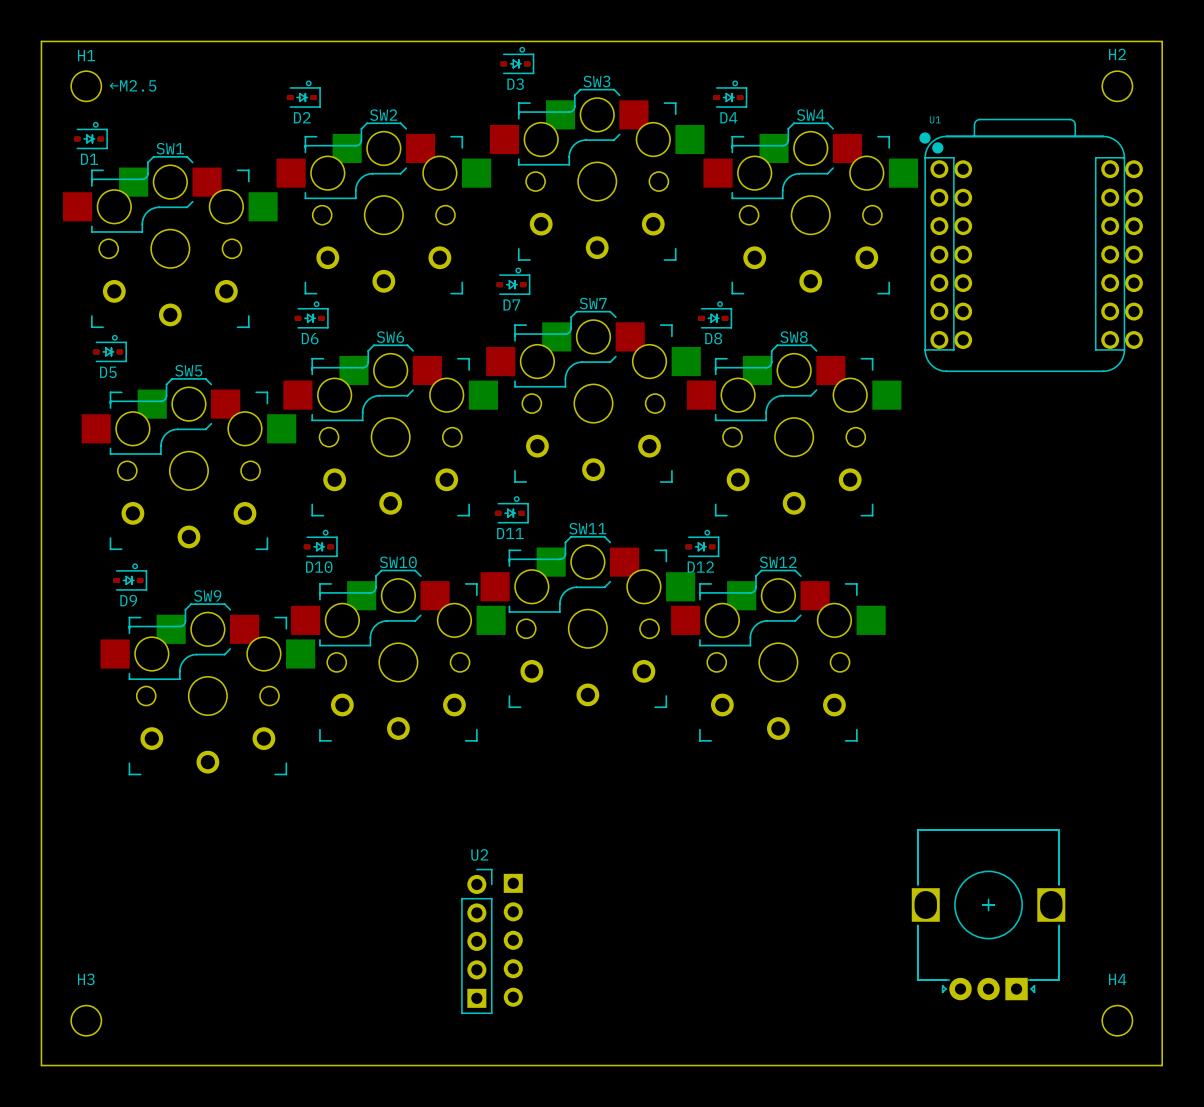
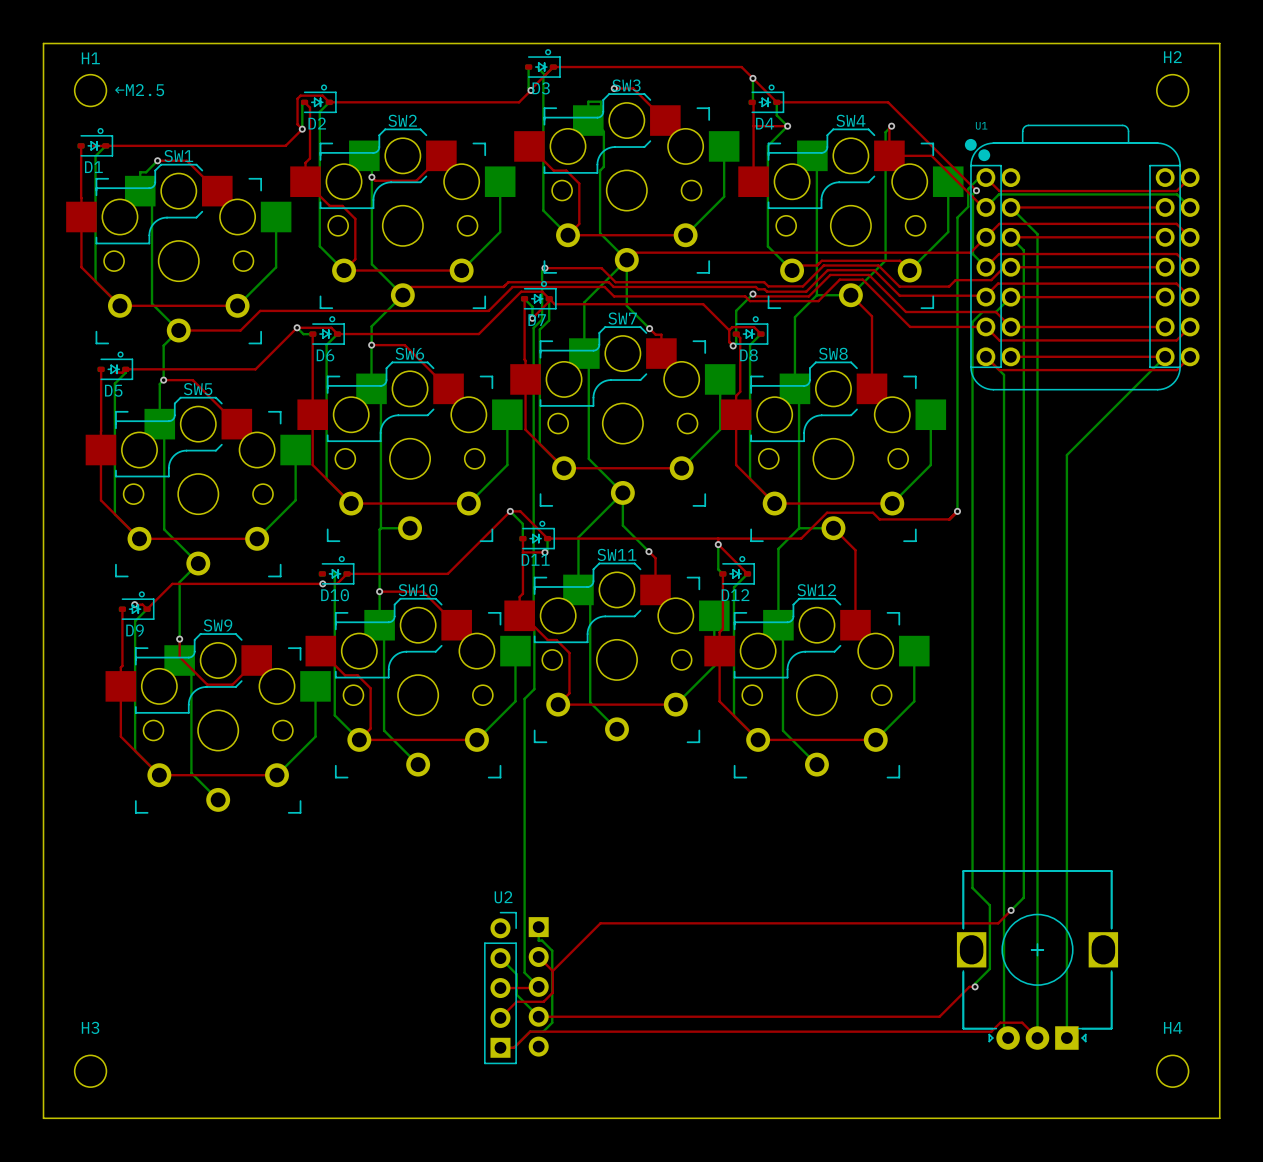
bottom track: none -> (528, 67) (528, 88) (530, 90)
bottom track: none -> (553, 67) (543, 77) (543, 210) (568, 235)
bottom track: none -> (538, 68) (545, 75)
bottom track: none -> (752, 78) (752, 102)
via: none -> (752, 78)
top track: none -> (614, 88) (633, 88) (665, 120)
via: none -> (614, 88)
via: none -> (530, 90)
top track: none -> (304, 102) (310, 107) (310, 158) (305, 162) (305, 181) (329, 205) (342, 205) (355, 218) (355, 259) (344, 270) (461, 270)
bottom track: none -> (304, 102) (302, 104) (302, 129)
bottom track: none -> (329, 102) (319, 111) (319, 246) (344, 270)
top track: none -> (752, 102) (753, 181)
bottom track: none -> (776, 102) (776, 115) (787, 126) (767, 145) (767, 246) (792, 270)
bottom track: none -> (588, 120) (588, 101) (601, 101) (603, 166) (600, 170) (600, 233) (626, 259)
top track: none -> (753, 126) (787, 126)
via: none -> (787, 126)
top track: none -> (891, 126) (889, 128) (889, 155) (931, 155) (983, 207) (985, 207)
bottom track: none -> (891, 126) (885, 132) (885, 260) (850, 295) (816, 295)
via: none -> (891, 126)
via: none -> (302, 129)
top track: none -> (81, 145) (81, 267) (119, 305) (237, 305)
top track: none -> (93, 145) (285, 145) (302, 129) (297, 124) (297, 98) (300, 95) (322, 95) (329, 102) (519, 102) (553, 67) (741, 67) (776, 102) (888, 102) (976, 190)
bottom track: none -> (105, 145) (95, 156) (95, 281) (119, 305)
top track: none -> (529, 146) (553, 170) (566, 170) (579, 183) (579, 223) (568, 235) (685, 235)
bottom track: none -> (724, 146) (724, 196) (685, 235)
bottom track: none -> (364, 155) (371, 163) (371, 264) (402, 295) (371, 326) (371, 345)
top track: none -> (441, 155) (416, 180) (375, 180) (371, 177)
bottom track: none -> (812, 155) (816, 160) (816, 295)
top track: none -> (157, 160) (186, 160) (217, 191)
bottom track: none -> (157, 160) (146, 172) (140, 172) (140, 191) (152, 202) (152, 303) (178, 330) (163, 345) (163, 380) (159, 384) (159, 424) (164, 428) (164, 529) (198, 563) (179, 582) (179, 660) (191, 672) (191, 773) (218, 799)
via: none -> (157, 160)
via: none -> (371, 177)
top track: none -> (985, 177) (999, 191) (1176, 191) (1190, 177)
bottom track: none -> (985, 177) (979, 177) (968, 188) (968, 206) (957, 217) (957, 511) (949, 519)
bottom track: none -> (500, 181) (500, 232) (461, 270)
bottom track: none -> (948, 181) (948, 232) (909, 270)
bottom track: none -> (976, 190) (972, 194) (972, 254) (985, 267)
via: none -> (976, 190)
bottom track: none -> (985, 207) (998, 194) (1177, 194) (1190, 207)
top track: none -> (1010, 207) (1165, 207)
bottom track: none -> (1010, 207) (1037, 234) (1037, 1038)
bottom track: none -> (276, 217) (276, 267) (237, 305)
top track: none -> (1010, 237) (1165, 237)
bottom track: none -> (1010, 237) (1023, 250) (1023, 897) (1011, 910)
top track: none -> (1190, 237) (1176, 223) (999, 223) (970, 252) (634, 252) (626, 259)
bottom track: none -> (626, 259) (626, 305) (649, 328)
bottom track: none -> (626, 259) (584, 302) (584, 353) (588, 358) (588, 458) (622, 492)
top track: none -> (985, 267) (999, 254) (1176, 254) (1190, 267)
top track: none -> (1165, 267) (1004, 267) (991, 280) (955, 280) (949, 286) (899, 286) (878, 265) (823, 265) (802, 286) (768, 286) (764, 282) (615, 282) (601, 268) (544, 268)
bottom track: none -> (544, 268) (542, 271) (542, 319) (533, 327) (534, 689) (524, 698) (524, 972) (538, 986)
via: none -> (544, 268)
top track: none -> (792, 270) (797, 265) (817, 265) (821, 260) (899, 260) (909, 270)
top track: none -> (752, 294) (755, 296) (808, 296) (830, 274) (868, 274) (905, 311) (995, 311) (1010, 326) (1165, 326)
bottom track: none -> (752, 294) (736, 310) (736, 342) (733, 345) (729, 341)
via: none -> (752, 294)
top track: none -> (402, 295) (411, 286) (503, 286) (508, 282) (608, 282) (613, 286) (755, 286) (767, 291) (806, 291) (827, 270) (874, 270) (899, 295) (985, 295)
bottom track: none -> (816, 295) (794, 317) (794, 388) (799, 392) (799, 528)
top track: none -> (850, 295) (871, 316) (871, 388)
top track: none -> (985, 295) (998, 283) (1176, 283) (1190, 297)
top track: none -> (1010, 297) (1165, 297)
bottom track: none -> (1010, 297) (995, 311) (982, 311) (972, 321) (972, 888) (989, 905) (989, 968) (975, 983) (975, 986)
top track: none -> (524, 298) (525, 429) (564, 468) (681, 468)
bottom track: none -> (524, 298) (532, 306) (532, 318)
bottom track: none -> (549, 298) (549, 320) (539, 329) (539, 444) (564, 468)
top track: none -> (550, 300) (554, 304) (703, 304) (729, 330)
top track: none -> (550, 300) (542, 291) (521, 291) (478, 334) (337, 334) (331, 327) (297, 327) (255, 369) (125, 369) (122, 372) (115, 372)
top track: none -> (550, 300) (532, 318)
via: none -> (532, 318)
top track: none -> (1190, 326) (1176, 340) (999, 340) (985, 326) (910, 326) (862, 279) (839, 279) (818, 301) (750, 301) (745, 296) (614, 296) (604, 286) (512, 286) (488, 310) (260, 310) (240, 330) (178, 330)
bottom track: none -> (297, 327) (303, 334) (312, 334)
via: none -> (297, 327)
top track: none -> (649, 328) (655, 334) (661, 334) (661, 353)
via: none -> (649, 328)
top track: none -> (729, 330) (732, 327) (754, 327) (761, 334)
top track: none -> (729, 330) (729, 341) (733, 345)
top track: none -> (312, 334) (312, 465) (351, 503) (468, 503)
bottom track: none -> (337, 334) (326, 345) (326, 478) (351, 503)
top track: none -> (736, 334) (740, 337) (740, 391) (736, 395) (736, 465) (774, 503) (892, 503)
bottom track: none -> (760, 334) (750, 345) (750, 478) (774, 503)
bottom track: none -> (371, 345) (371, 388) (380, 398) (380, 528)
top track: none -> (371, 345) (404, 345) (448, 388)
via: none -> (371, 345)
via: none -> (733, 345)
top track: none -> (985, 356) (999, 370) (1176, 370) (1190, 356)
bottom track: none -> (985, 356) (1004, 374) (1004, 1033) (1008, 1038)
top track: none -> (1010, 356) (1165, 356)
bottom track: none -> (1165, 356) (1066, 455) (1066, 1038)
top track: none -> (101, 369) (100, 500) (139, 538) (257, 538)
bottom track: none -> (125, 369) (125, 372) (114, 383) (114, 514) (139, 538)
bottom track: none -> (720, 379) (720, 429) (681, 468)
top track: none -> (163, 380) (192, 380) (236, 424)
via: none -> (163, 380)
bottom track: none -> (507, 414) (507, 465) (468, 503)
bottom track: none -> (930, 414) (930, 465) (892, 503)
bottom track: none -> (295, 450) (295, 500) (257, 538)
bottom track: none -> (622, 492) (622, 525) (648, 551)
bottom track: none -> (622, 492) (578, 537) (578, 589) (590, 601) (590, 702) (616, 729)
bottom track: none -> (510, 511) (522, 523) (522, 538)
via: none -> (510, 511)
top track: none -> (957, 511) (949, 519) (879, 519) (872, 512) (827, 512) (801, 538) (547, 538) (520, 511) (510, 511) (447, 573) (347, 573) (337, 583) (172, 583) (147, 609) (142, 604) (134, 604)
via: none -> (957, 511)
bottom track: none -> (380, 528) (379, 625) (384, 629) (384, 730) (418, 764)
bottom track: none -> (380, 528) (410, 528)
bottom track: none -> (799, 528) (833, 528)
bottom track: none -> (799, 528) (778, 548) (778, 625) (782, 629) (782, 730) (816, 764)
top track: none -> (833, 528) (855, 550) (855, 625)
top track: none -> (522, 538) (522, 593) (519, 596) (519, 615)
bottom track: none -> (547, 538) (547, 549) (544, 552)
top track: none -> (718, 538) (718, 544) (747, 573)
bottom track: none -> (718, 544) (718, 569) (722, 573)
via: none -> (718, 544)
top track: none -> (648, 551) (655, 558) (655, 589)
via: none -> (648, 551)
top track: none -> (522, 552) (544, 552)
via: none -> (544, 552)
bottom track: none -> (334, 572) (334, 715) (359, 739)
top track: none -> (722, 573) (722, 628) (719, 632) (719, 701) (758, 739) (875, 739)
bottom track: none -> (747, 573) (734, 587) (734, 715) (758, 739)
via: none -> (322, 583)
top track: none -> (379, 591) (423, 591) (456, 625)
via: none -> (379, 591)
via: none -> (134, 604)
top track: none -> (122, 609) (120, 736) (159, 775) (276, 775)
bottom track: none -> (147, 609) (135, 621) (135, 750) (159, 775)
top track: none -> (519, 611) (547, 640) (556, 640) (569, 652) (569, 693) (558, 704) (675, 704)
bottom track: none -> (714, 615) (714, 666) (675, 704)
top track: none -> (179, 639) (179, 657) (207, 684) (232, 684) (256, 660)
via: none -> (179, 639)
top track: none -> (320, 651) (345, 675) (357, 675) (370, 688) (370, 728) (359, 739) (476, 739)
bottom track: none -> (515, 651) (515, 701) (476, 739)
bottom track: none -> (914, 651) (914, 701) (875, 739)
bottom track: none -> (315, 686) (315, 736) (276, 775)
top track: none -> (1011, 910) (998, 923) (600, 923) (552, 971)
via: none -> (1011, 910)
bottom track: none -> (538, 927) (538, 940) (542, 940) (552, 950) (552, 1022) (543, 1031) (530, 1031) (514, 1047) (500, 1047)
top track: none -> (538, 956) (552, 971)
bottom track: none -> (500, 958) (516, 974) (516, 994) (538, 1016)
top track: none -> (552, 971) (552, 992) (543, 1001) (516, 1001) (500, 1017)
top track: none -> (538, 986) (500, 988)
top track: none -> (975, 986) (969, 986) (939, 1016) (538, 1016)
via: none -> (975, 986)
top track: none -> (1037, 1038) (1022, 1022) (1000, 1022) (991, 1031) (530, 1031) (514, 1047) (500, 1047)

